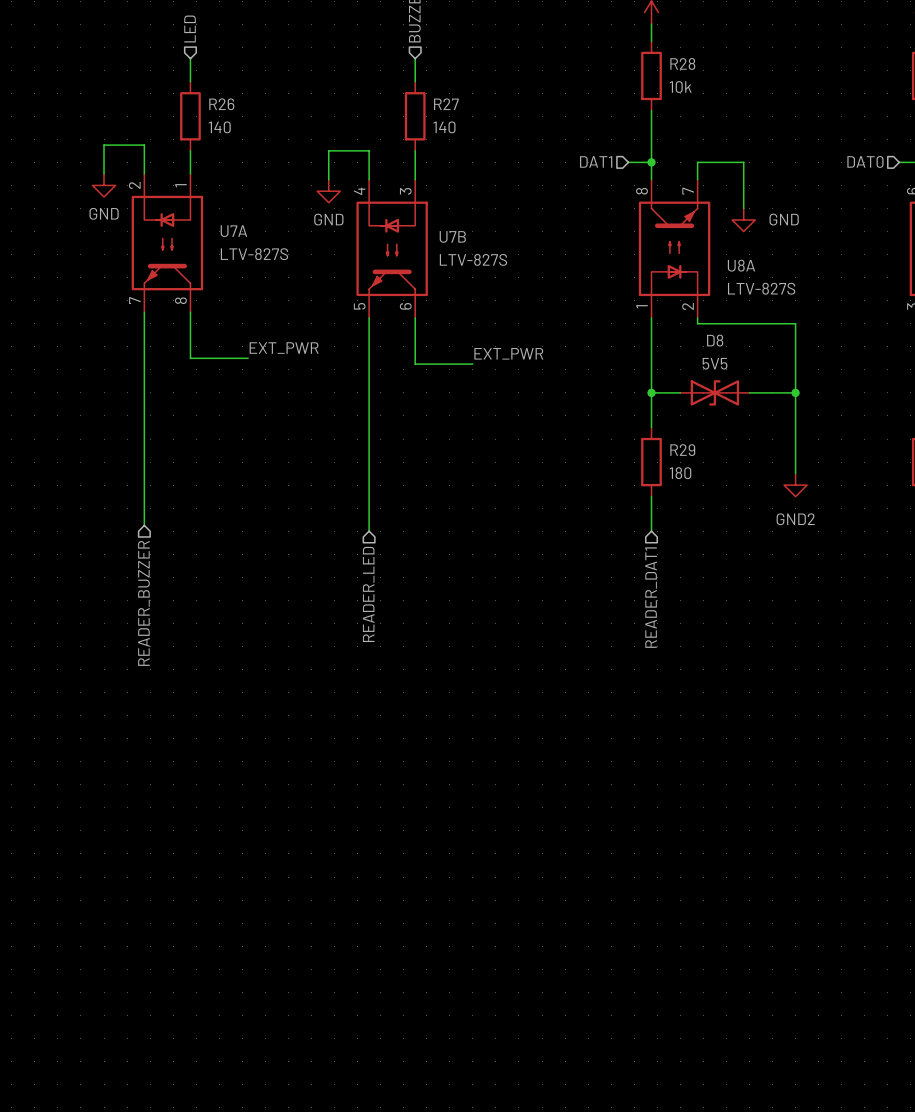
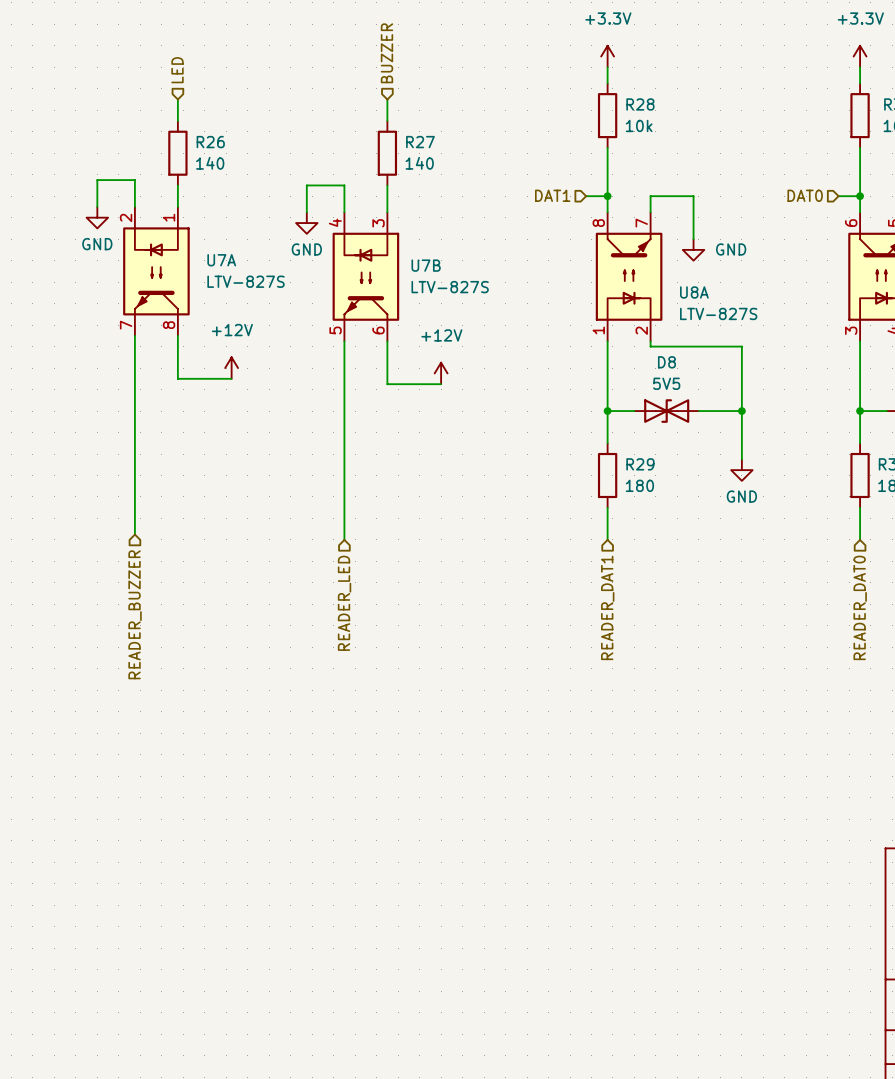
power symbol: none -> +12V (231, 368)
label: EXT_PWR (284, 348) -> none
power symbol: none -> +12V (441, 373)
label: EXT_PWR (508, 353) -> none
power symbol: none -> GND (741, 470)
power symbol: GND2 (795, 485) -> none

